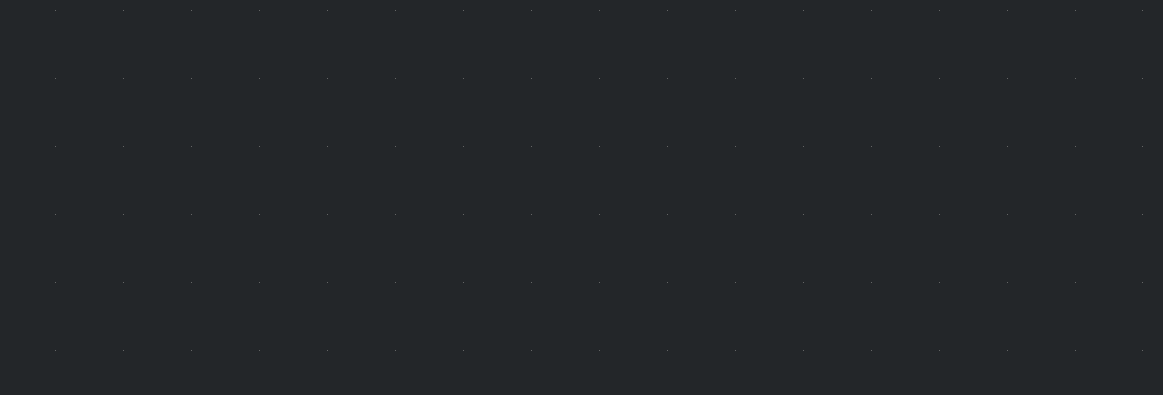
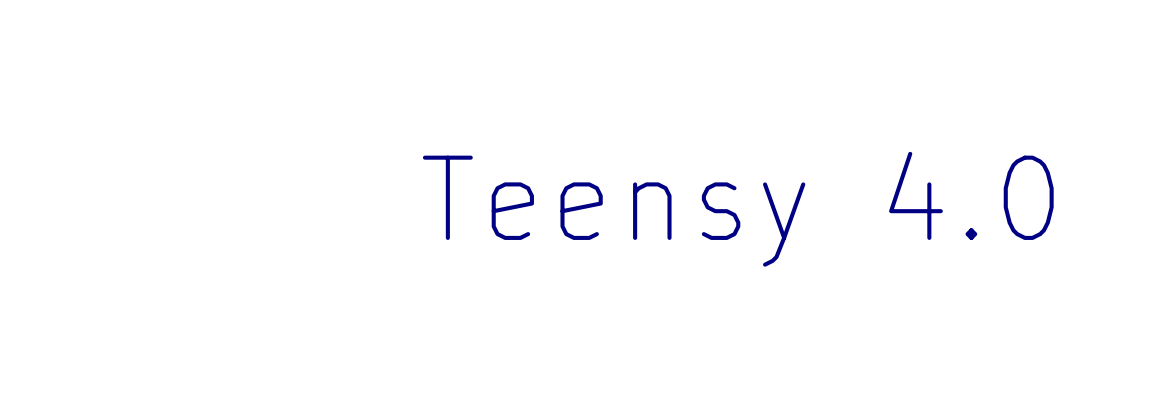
text: none -> Teensy 4.0 (738, 209)

